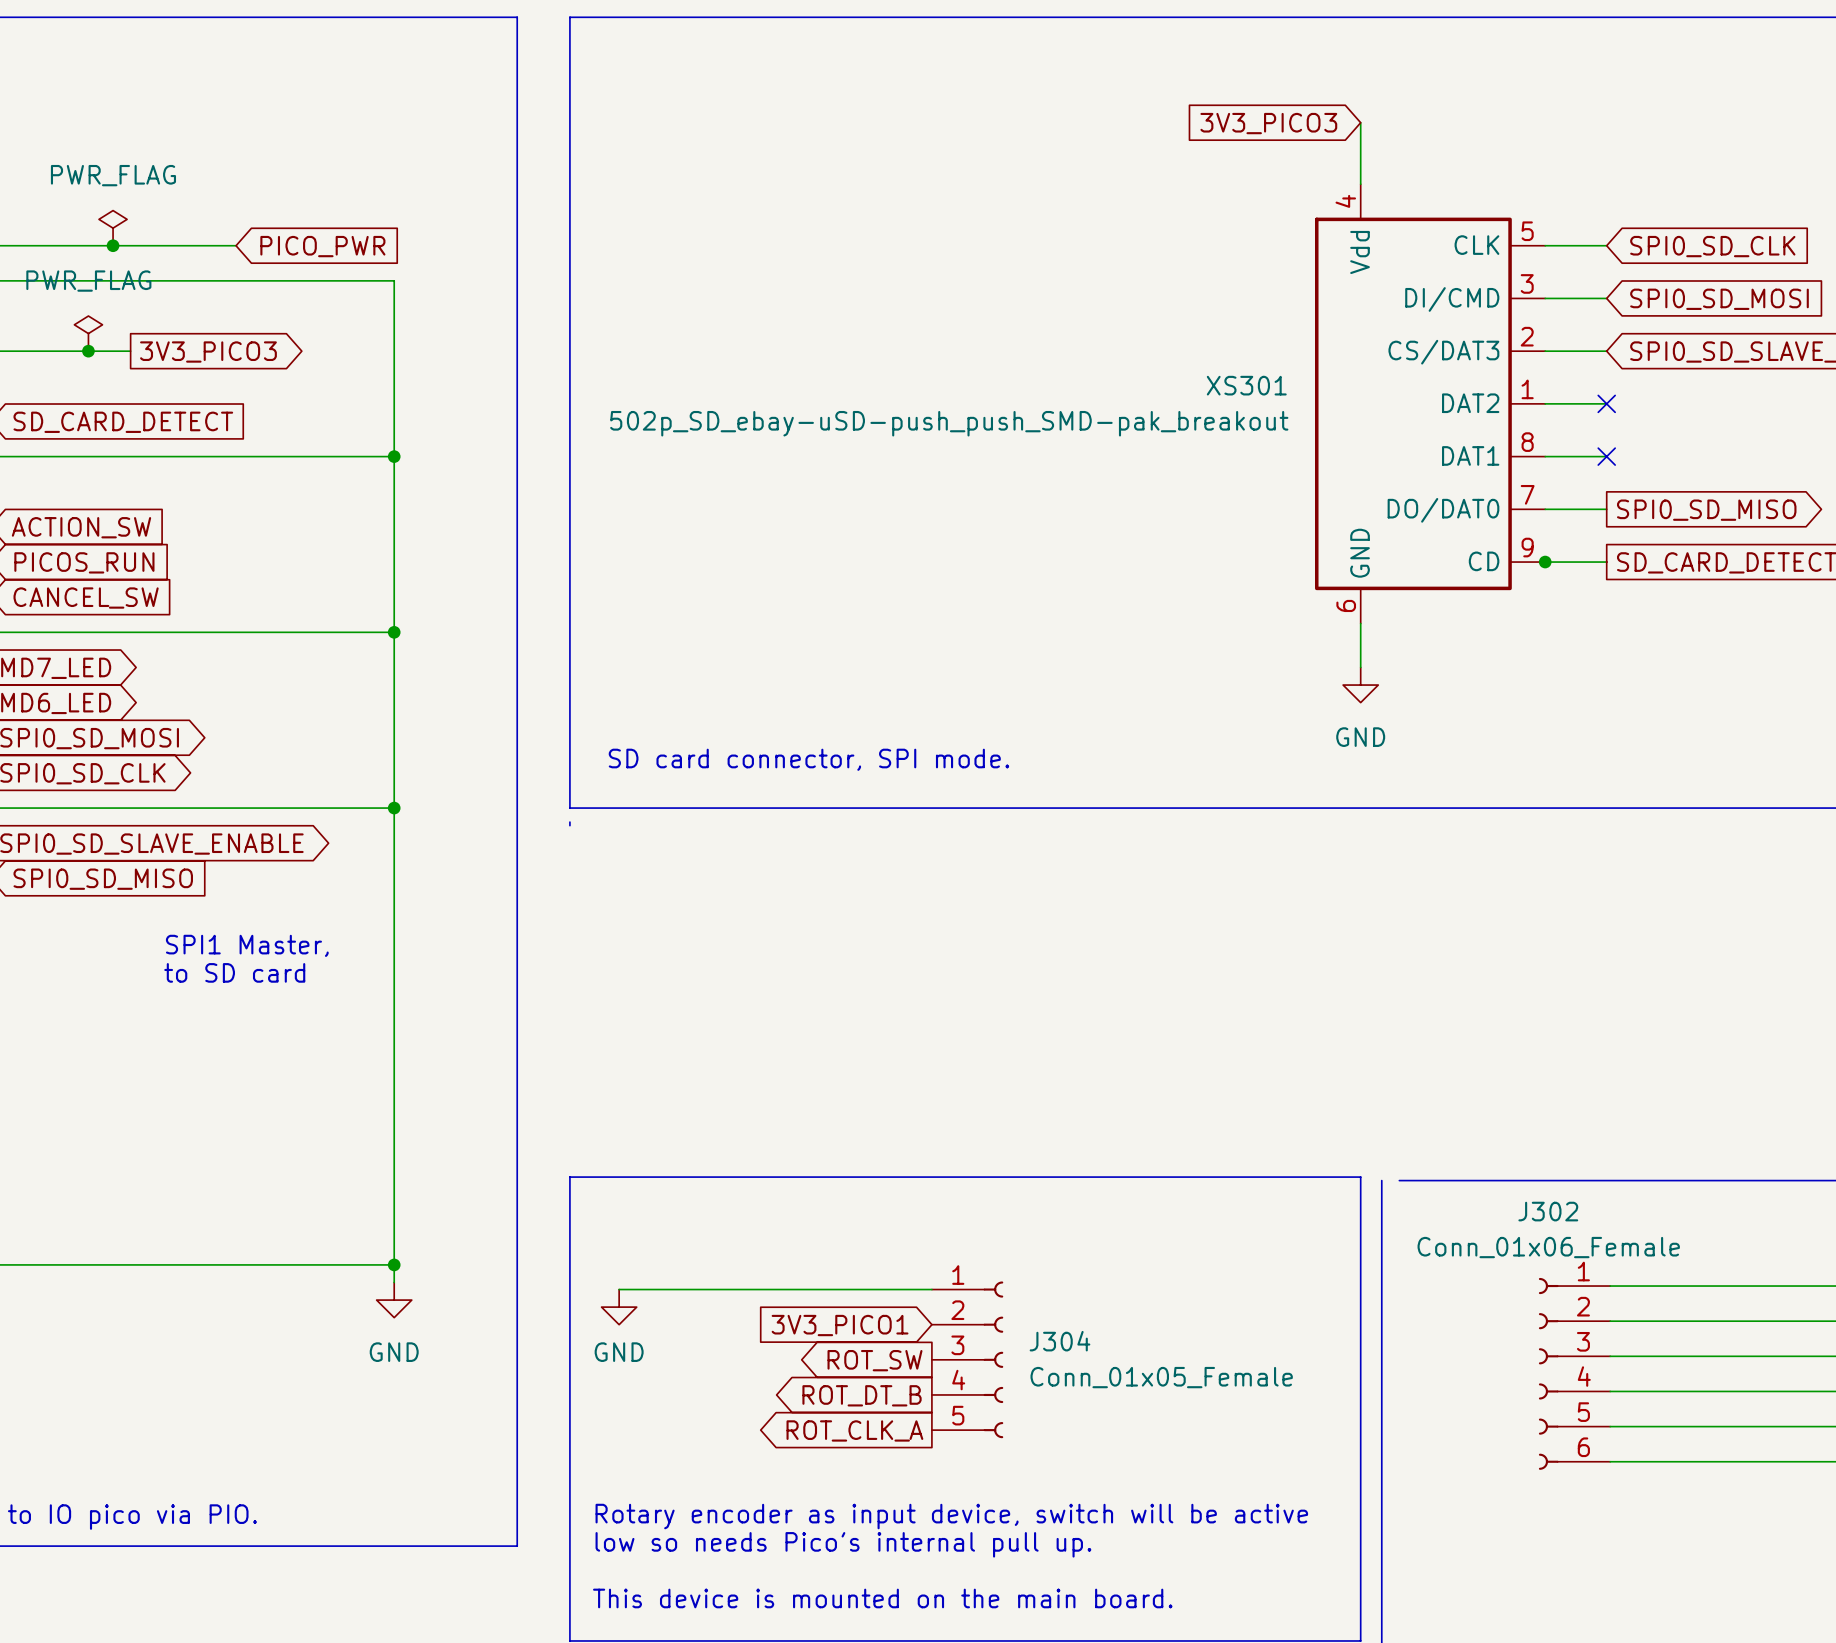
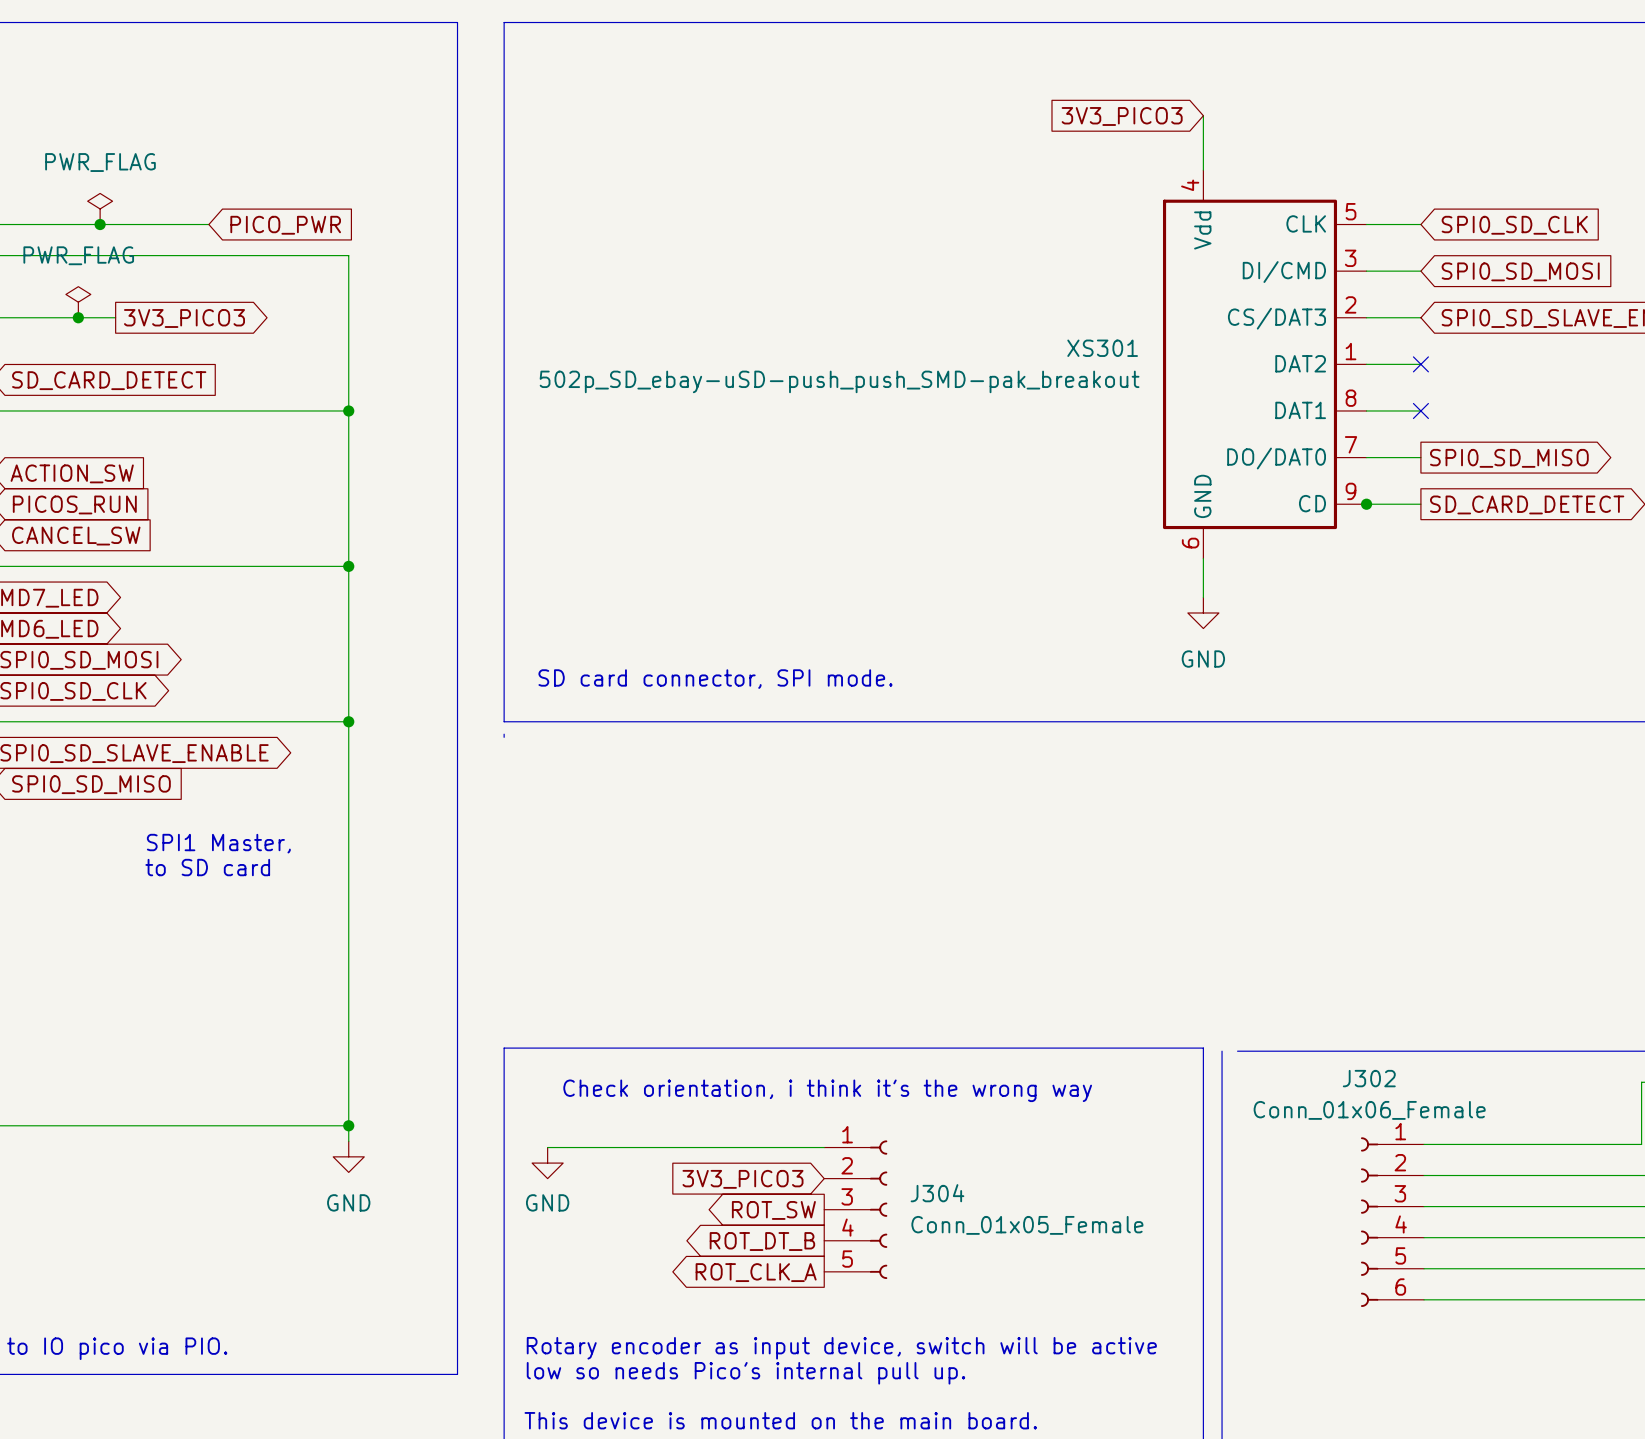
text: none -> Check orientation, i think it's the wrong way (827, 1090)
global label: 3V3_PICO1 (840, 1325) -> 3V3_PICO3 (742, 1179)

